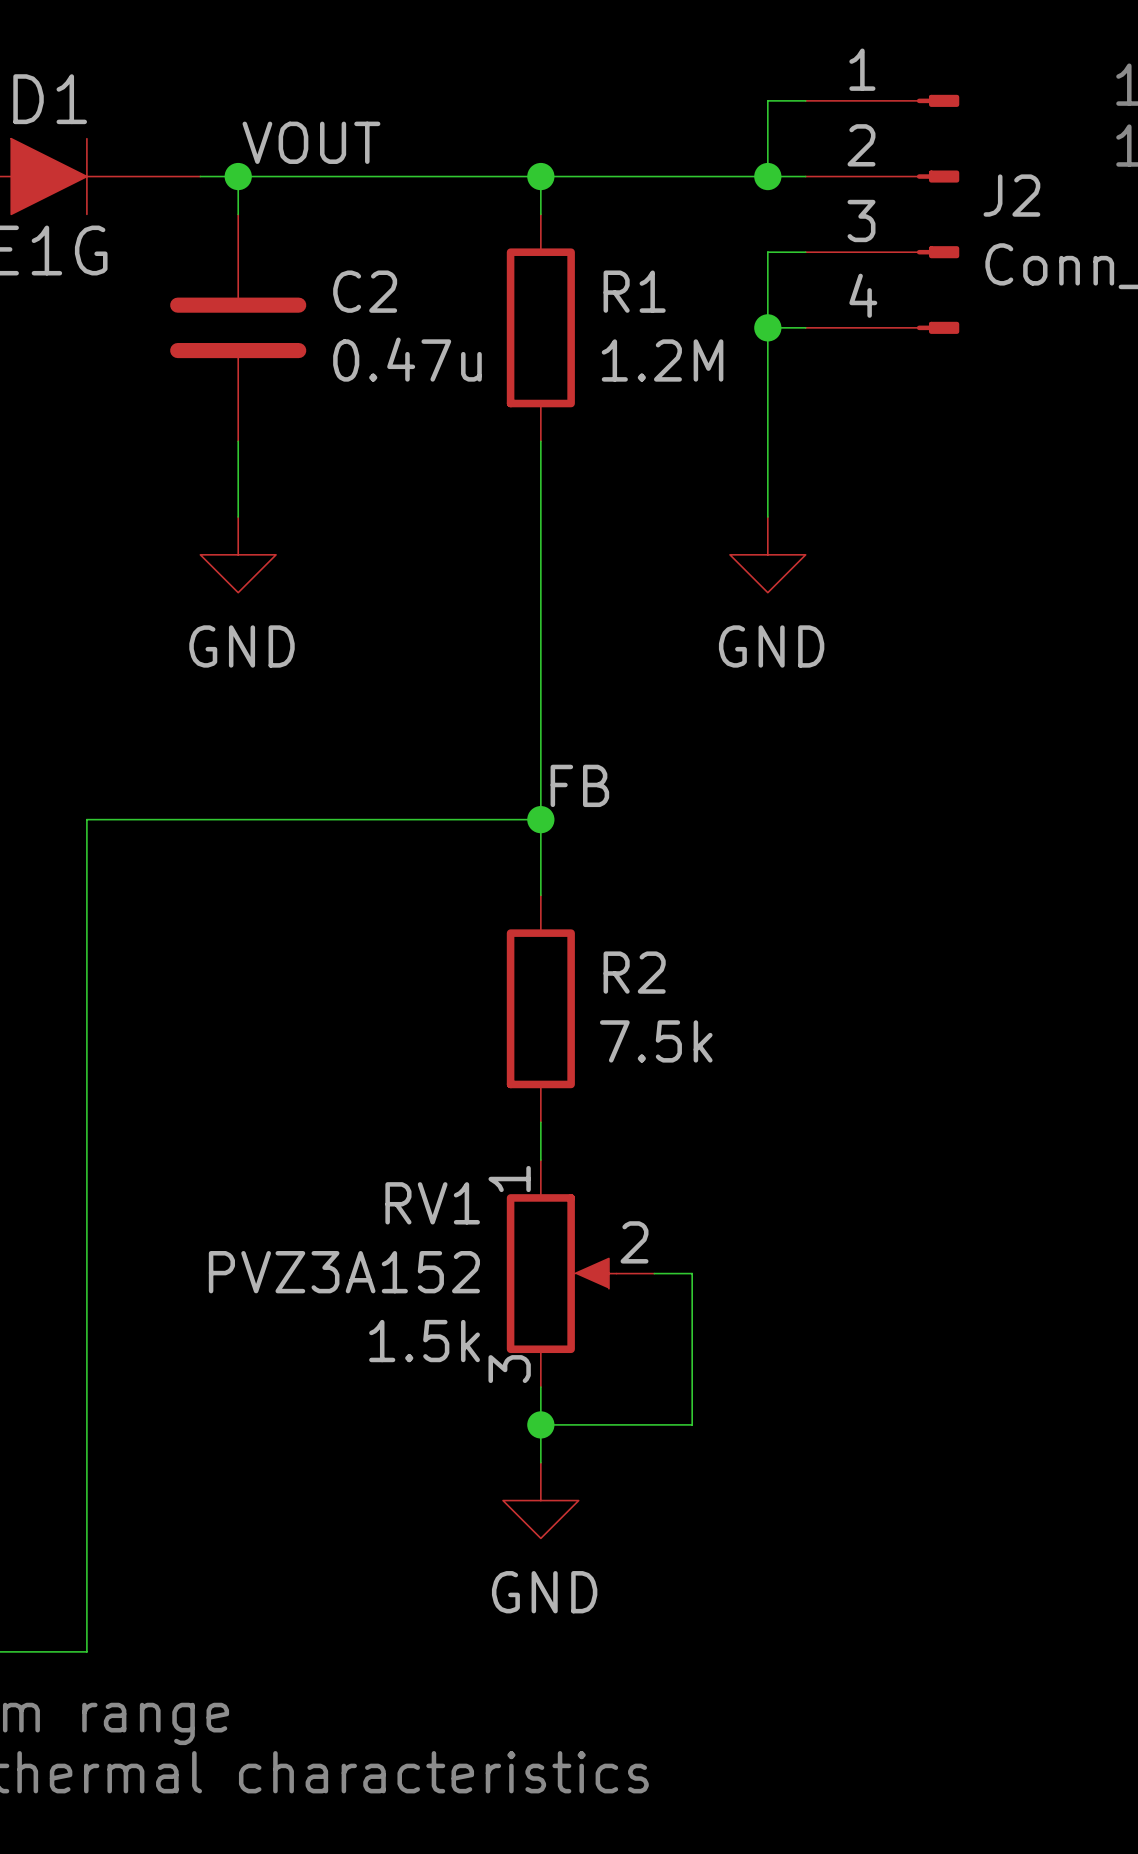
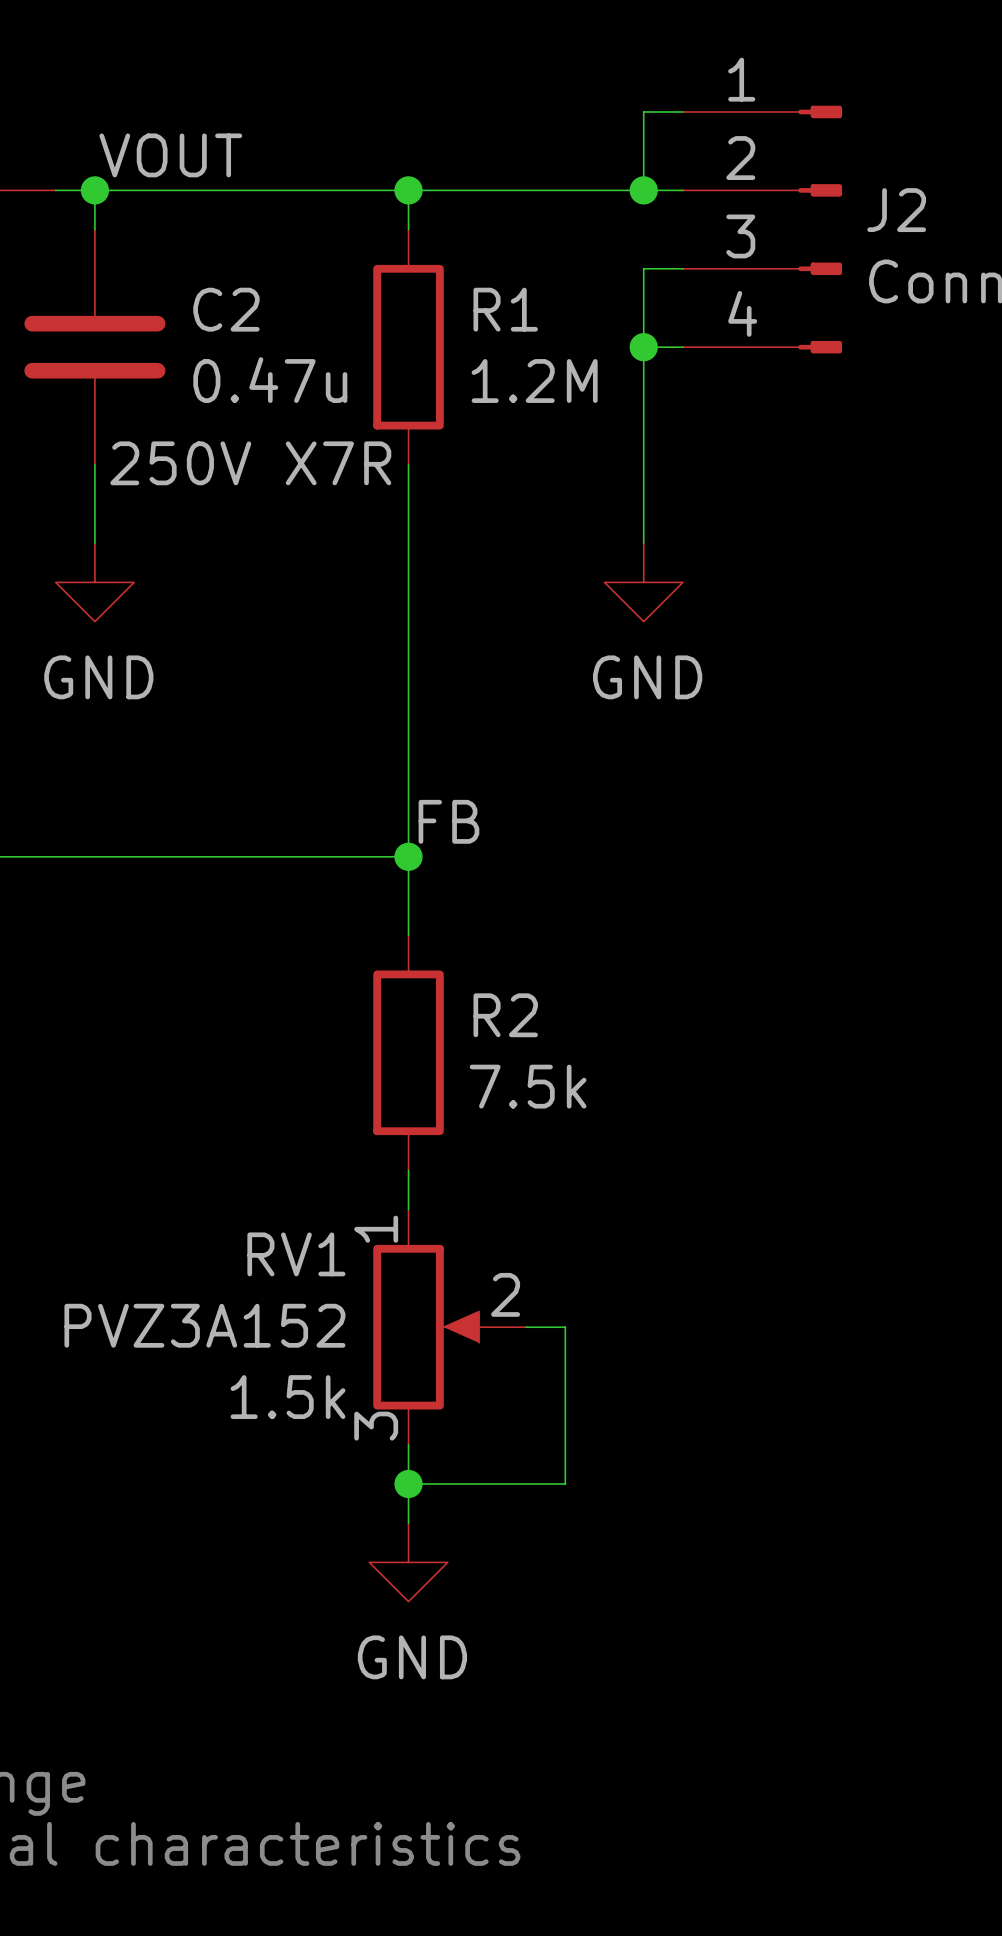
C2 text: none -> 250V X7R (250, 463)

